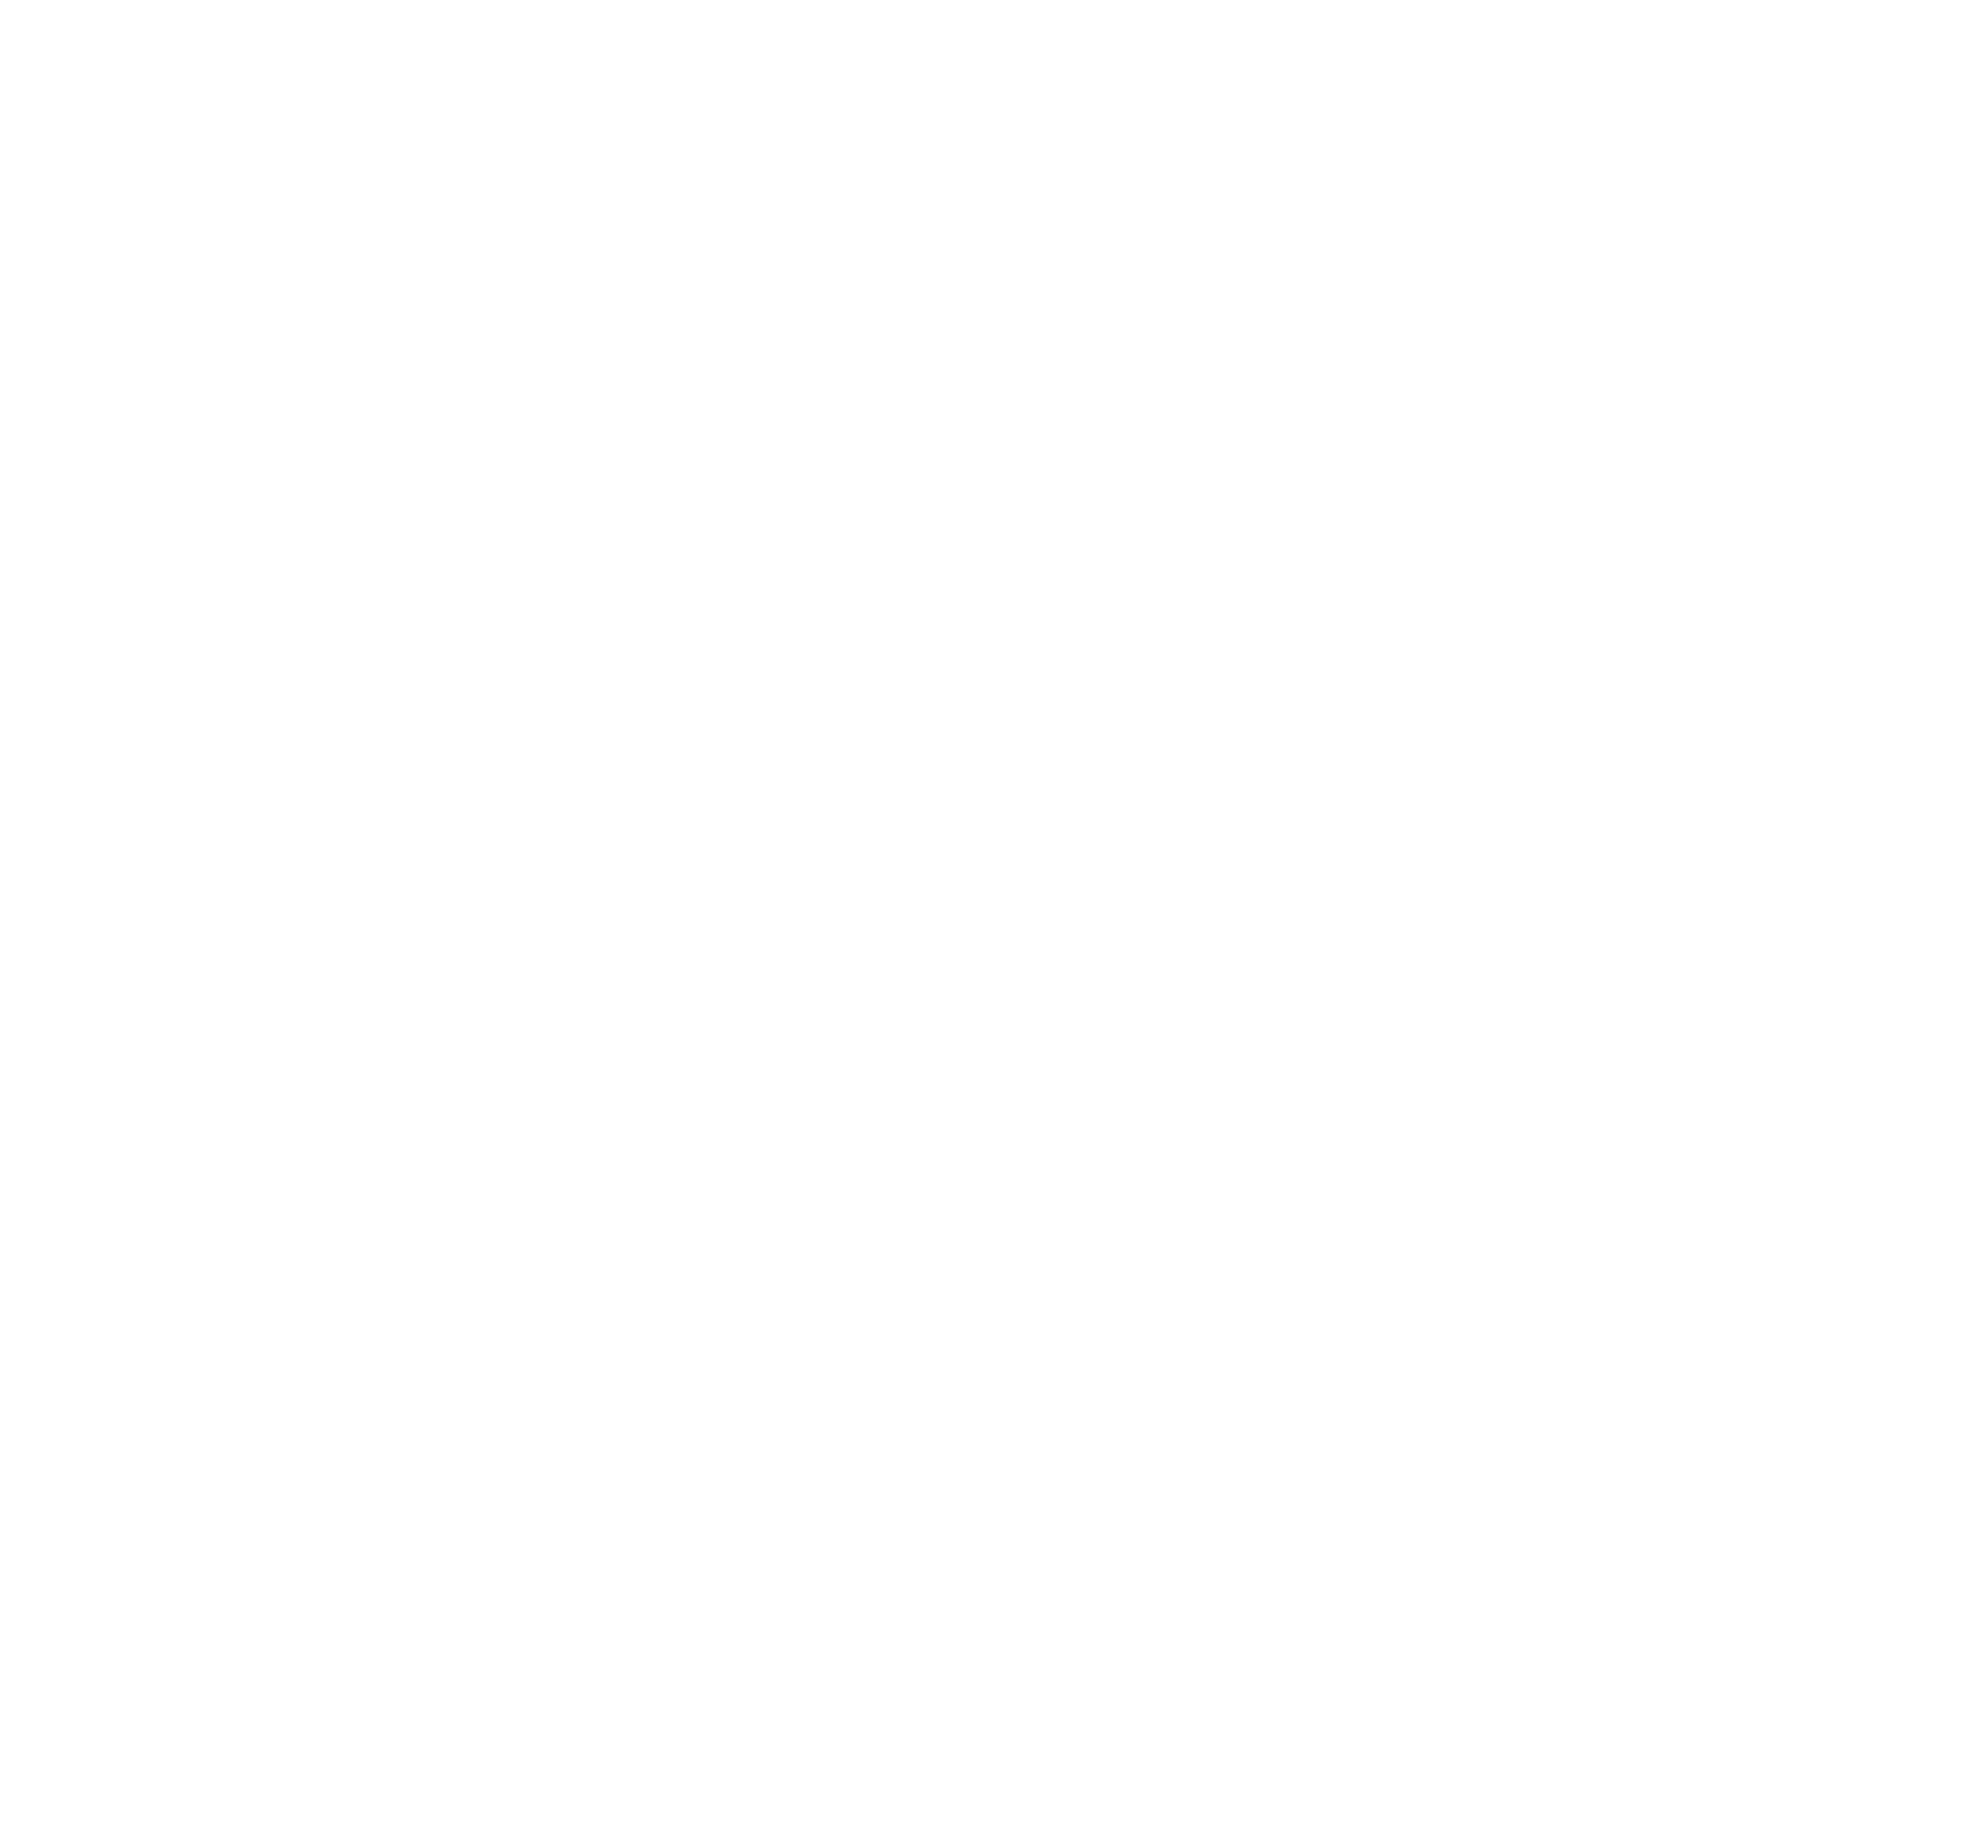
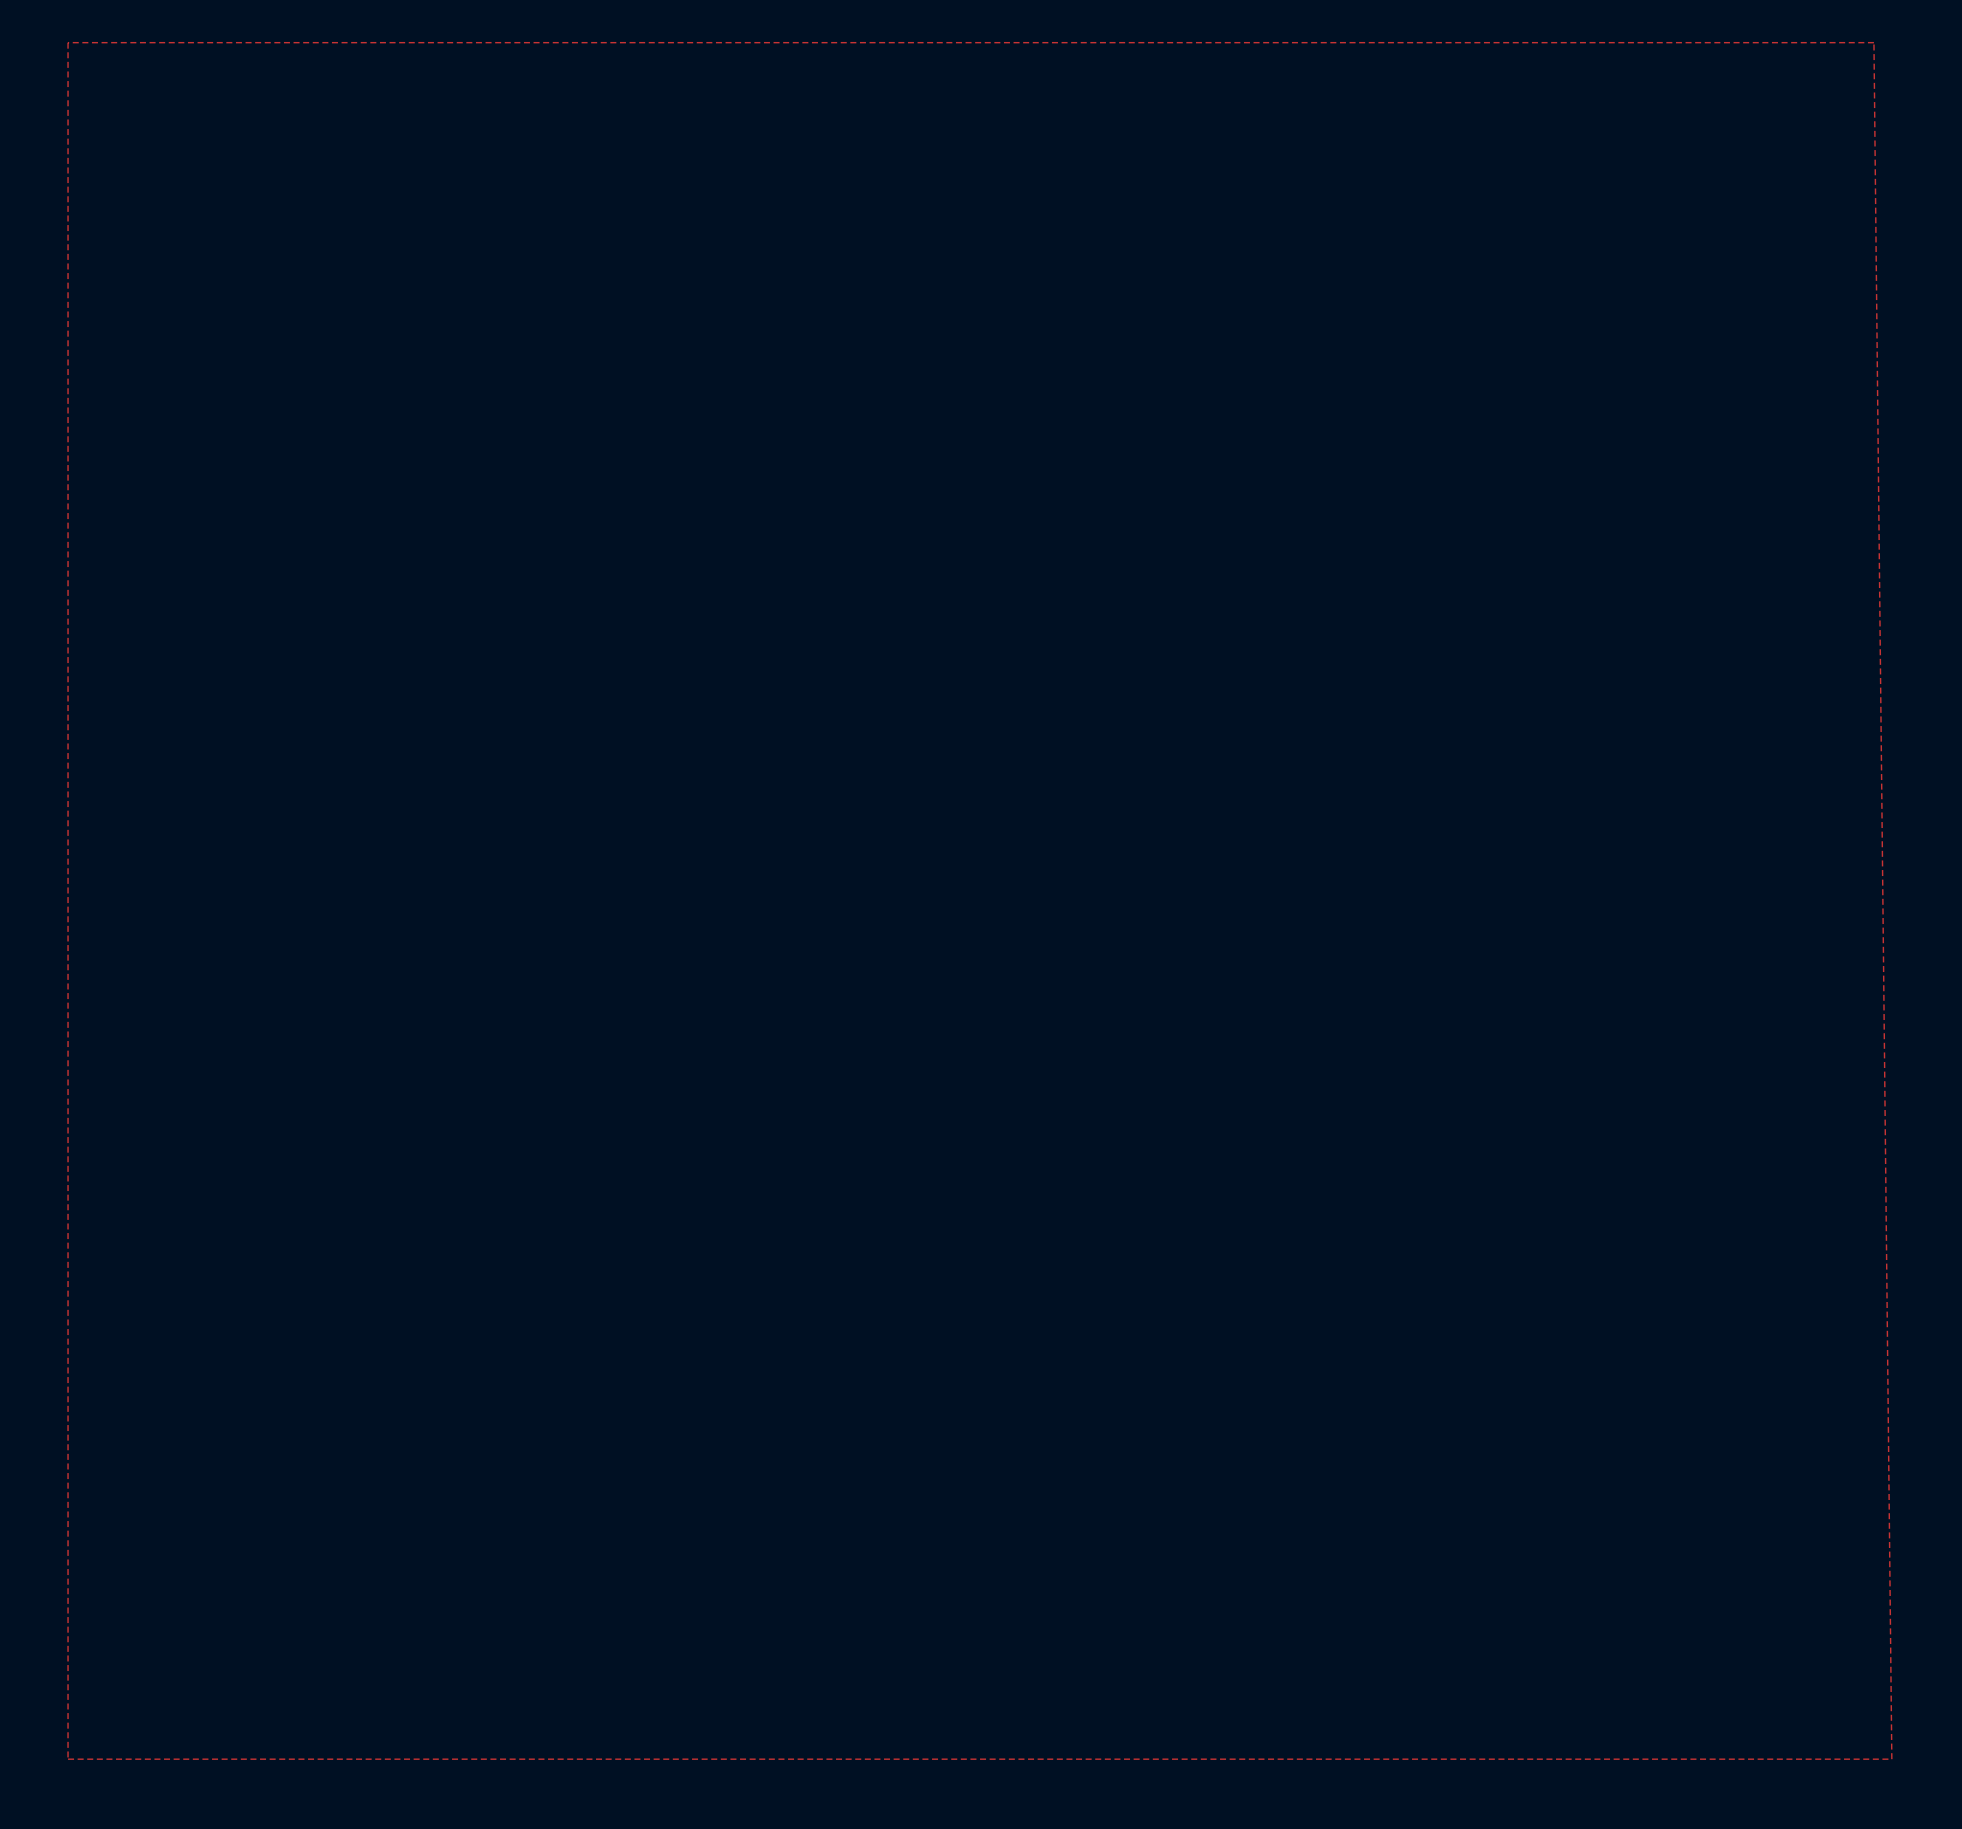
zone outline: none -> (68, 42) (68, 1759) (1891, 1759) (1873, 42) (68, 42)

